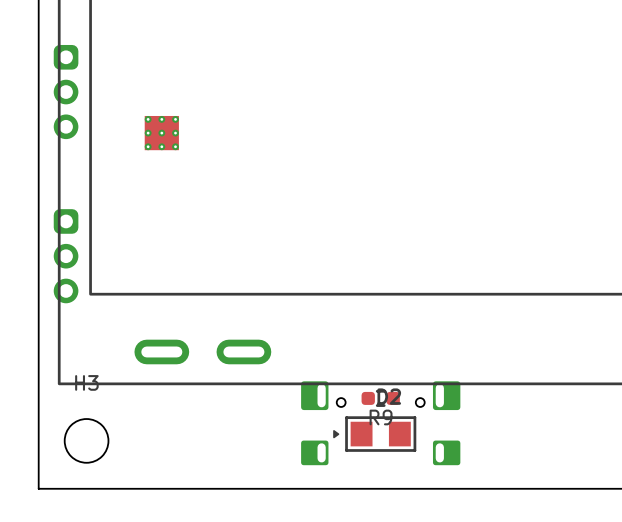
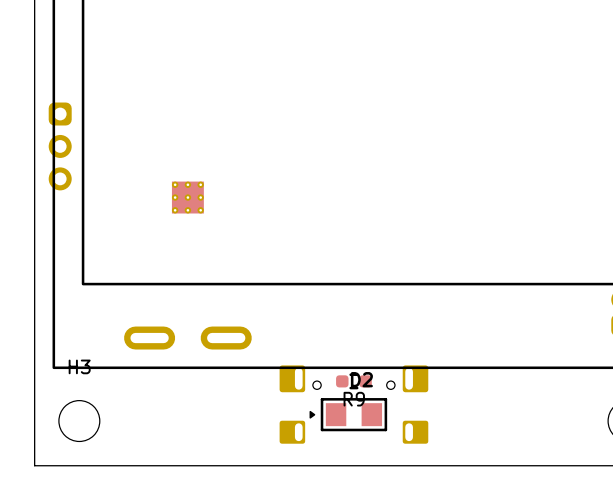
part: (66, 92) -> none
part position: (161, 133) -> (187, 197)
part: none -> (60, 146)
part: (66, 256) -> none

